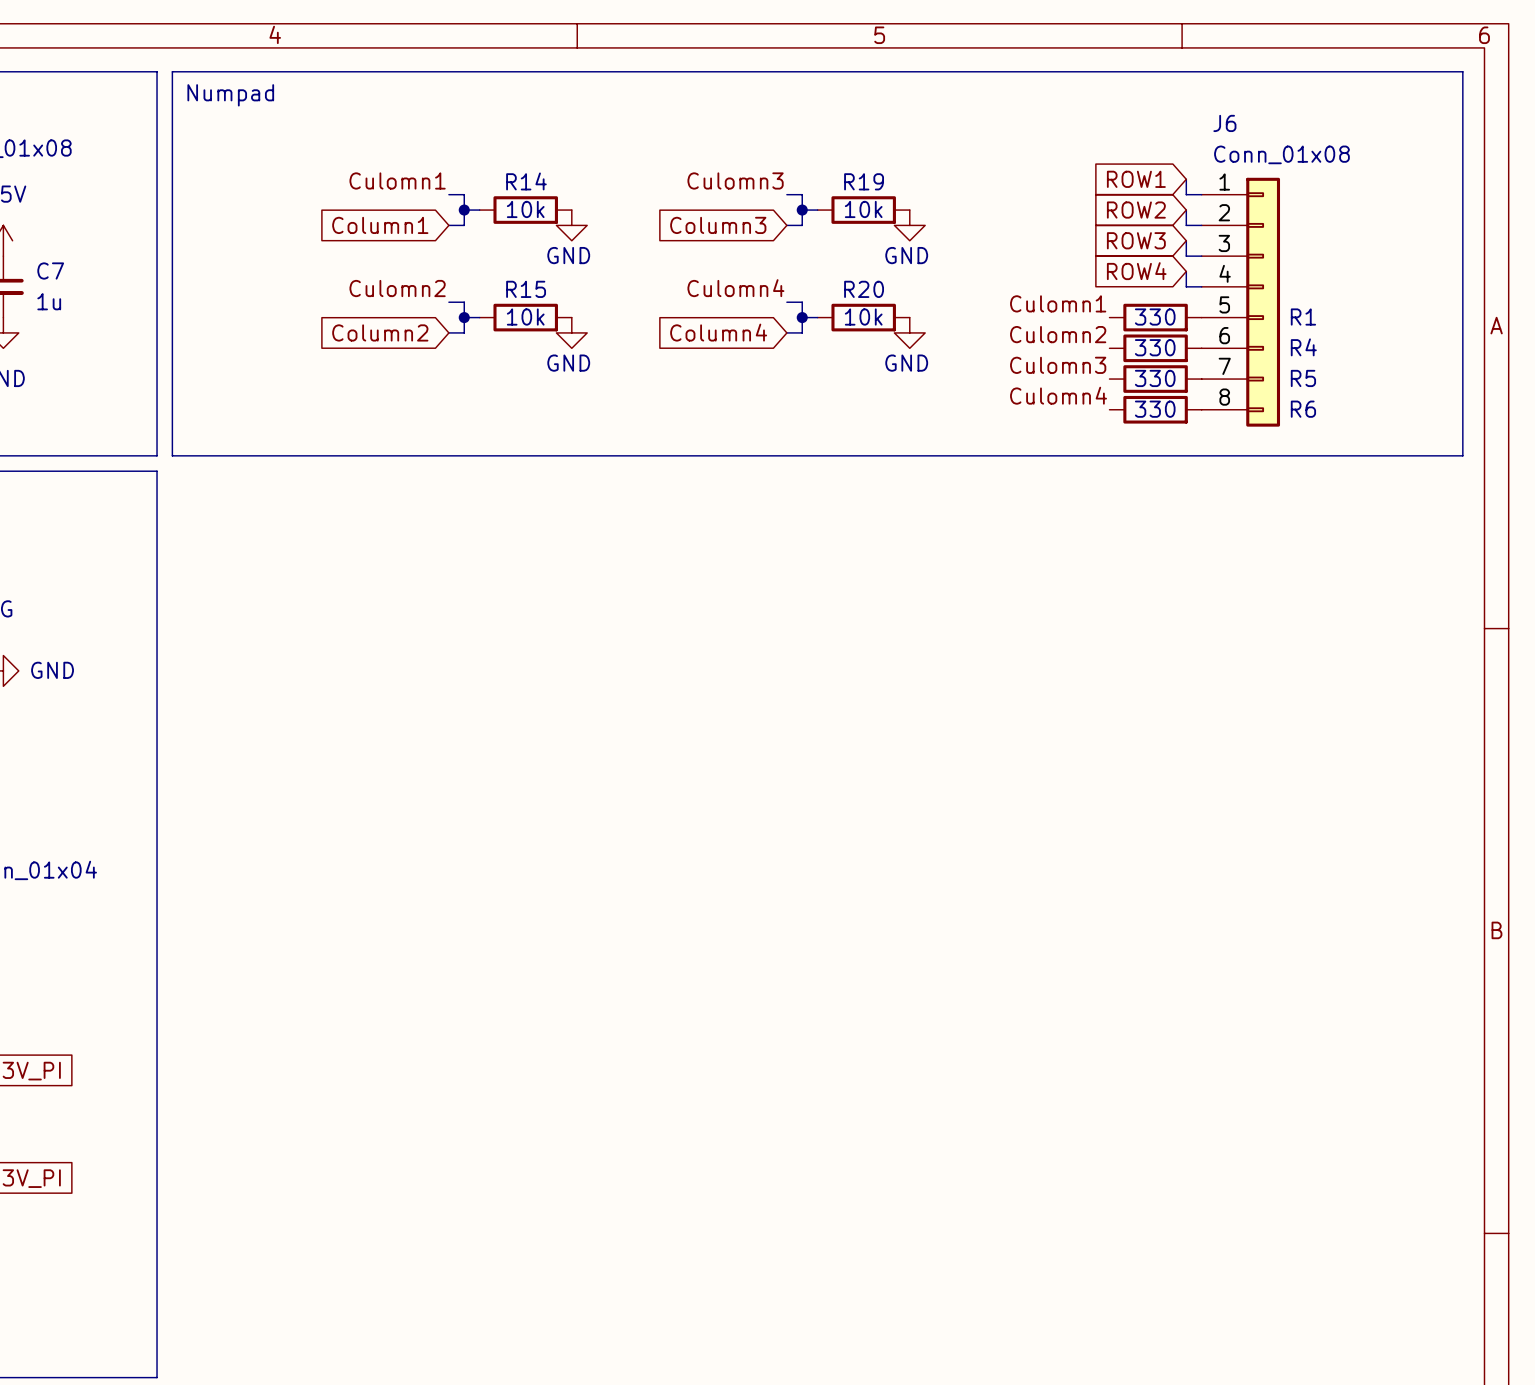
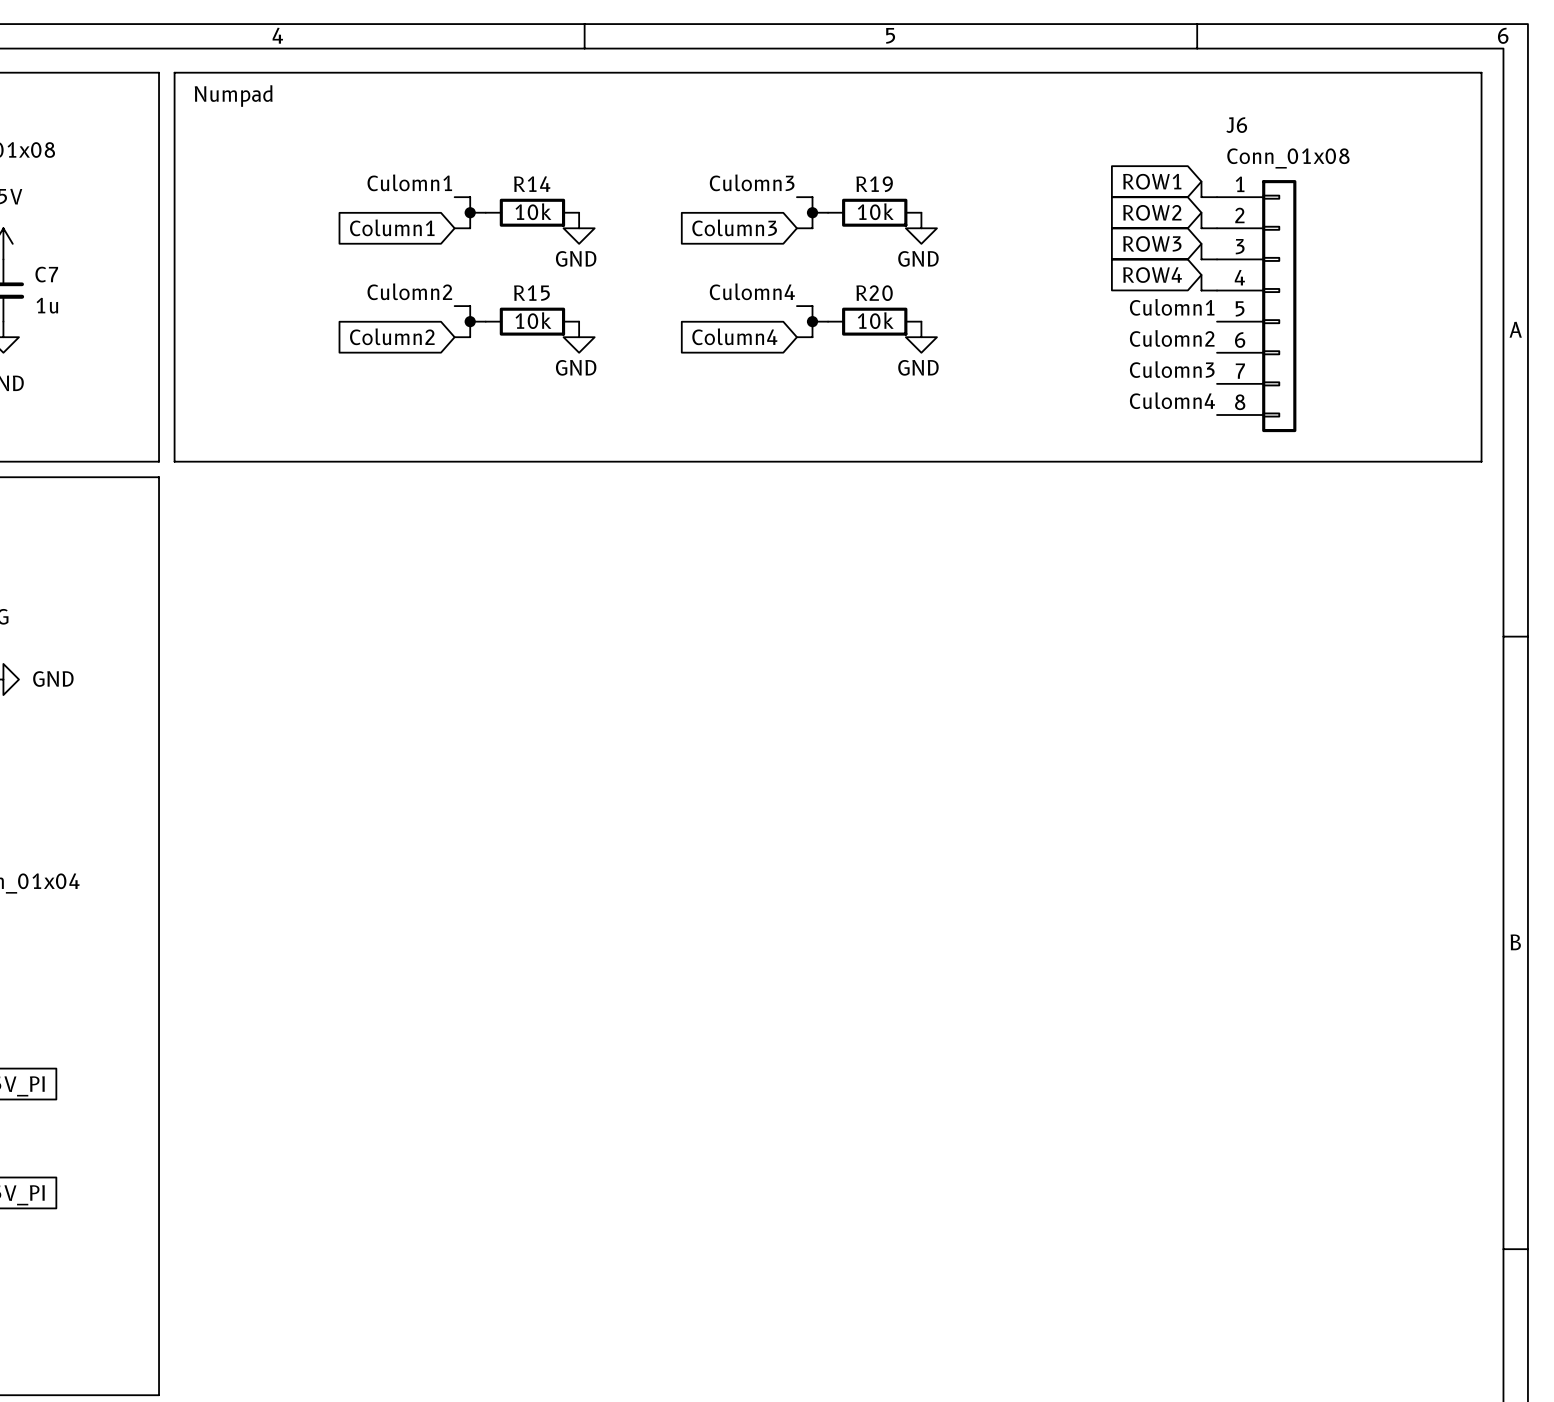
label position: Culomn1 (1058, 303) -> Culomn1 (1172, 307)
R1: 330 (1155, 317) -> none
label position: Culomn2 (1058, 334) -> Culomn2 (1172, 338)
R4: 330 (1155, 348) -> none
label position: Culomn3 (1058, 365) -> Culomn3 (1172, 369)
R5: 330 (1155, 379) -> none
label position: Culomn4 (1058, 395) -> Culomn4 (1172, 400)
R6: 330 (1155, 409) -> none

